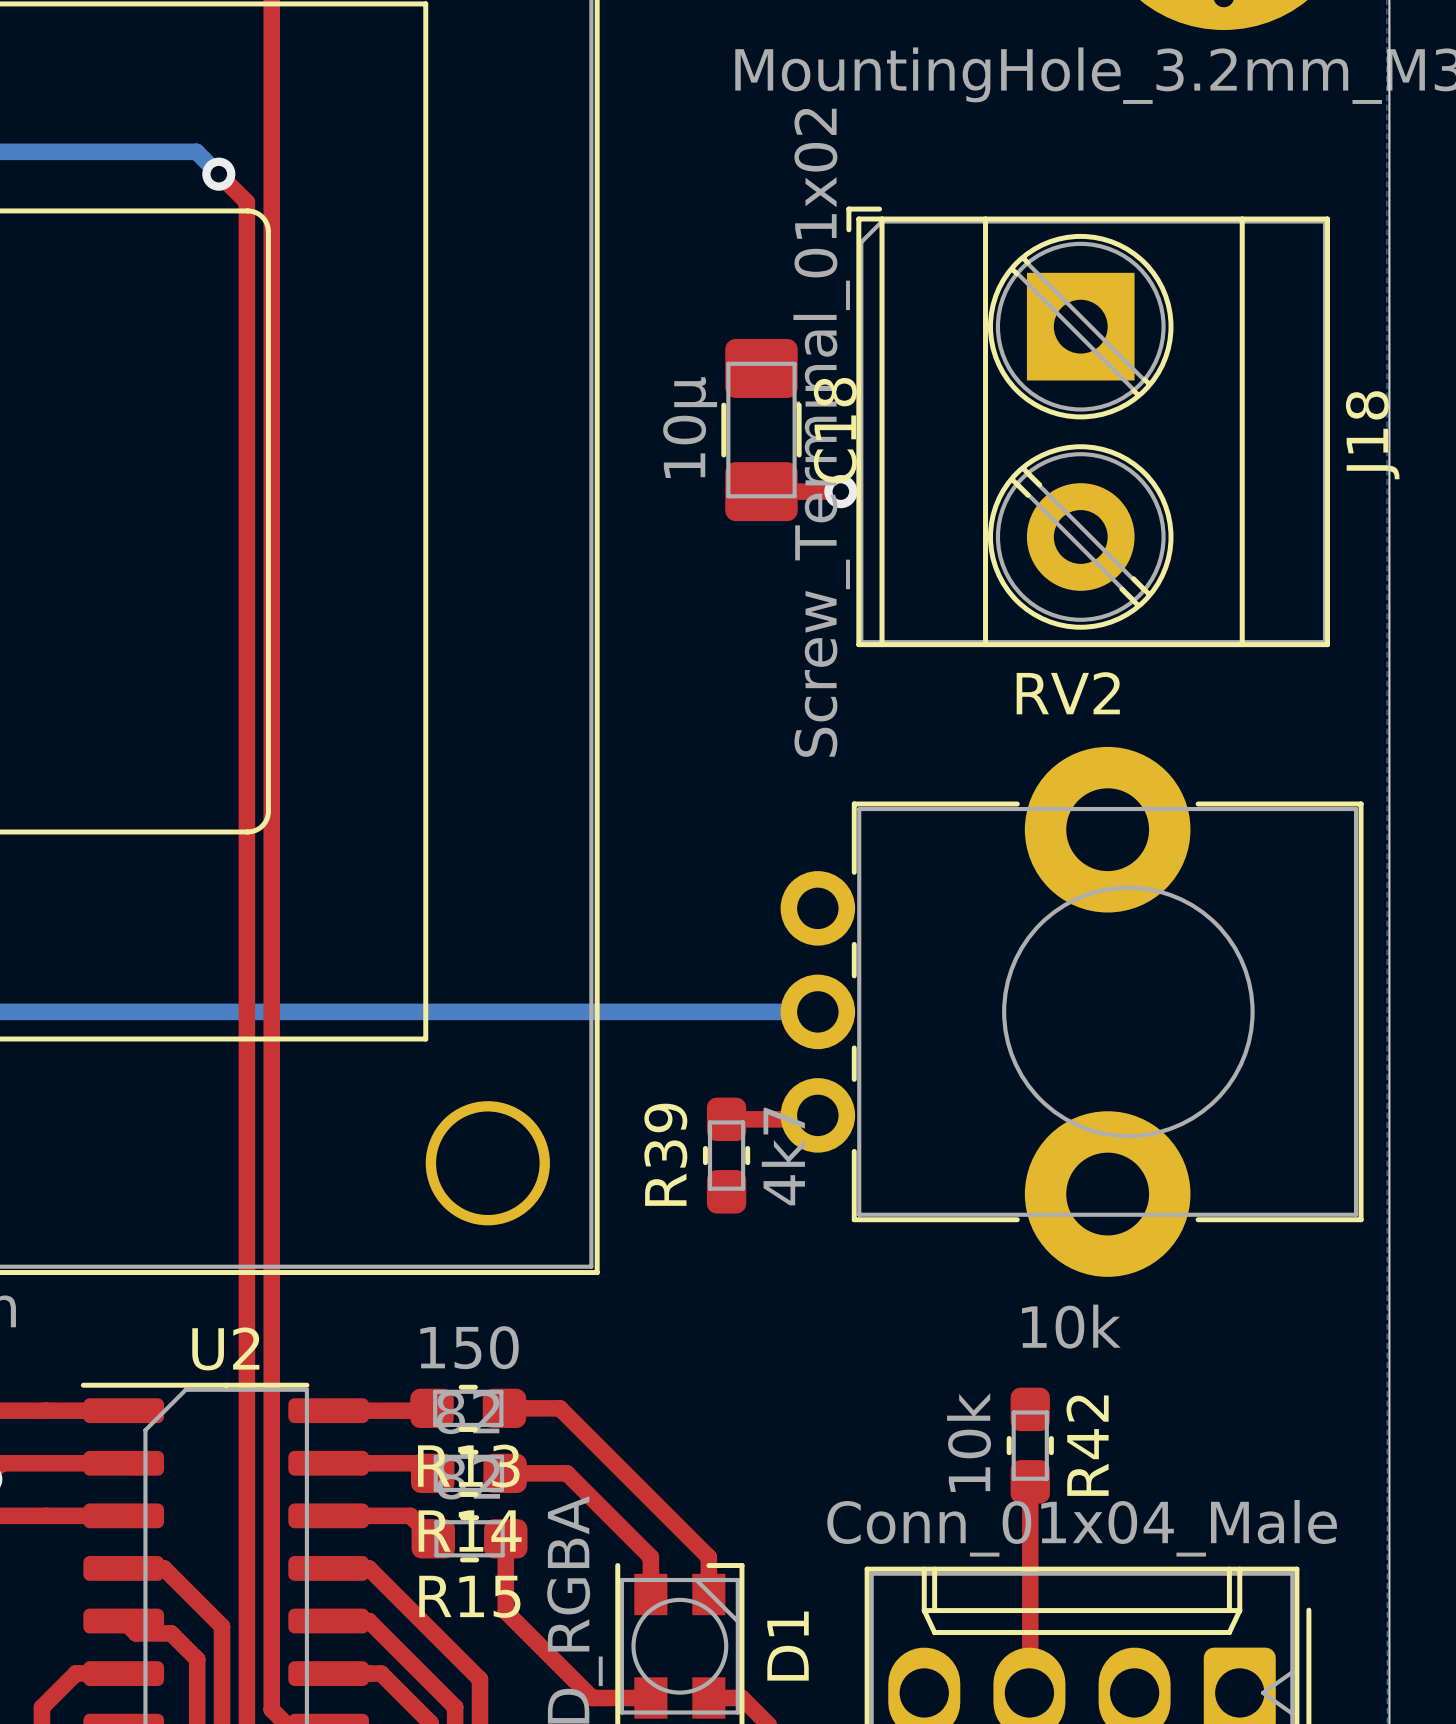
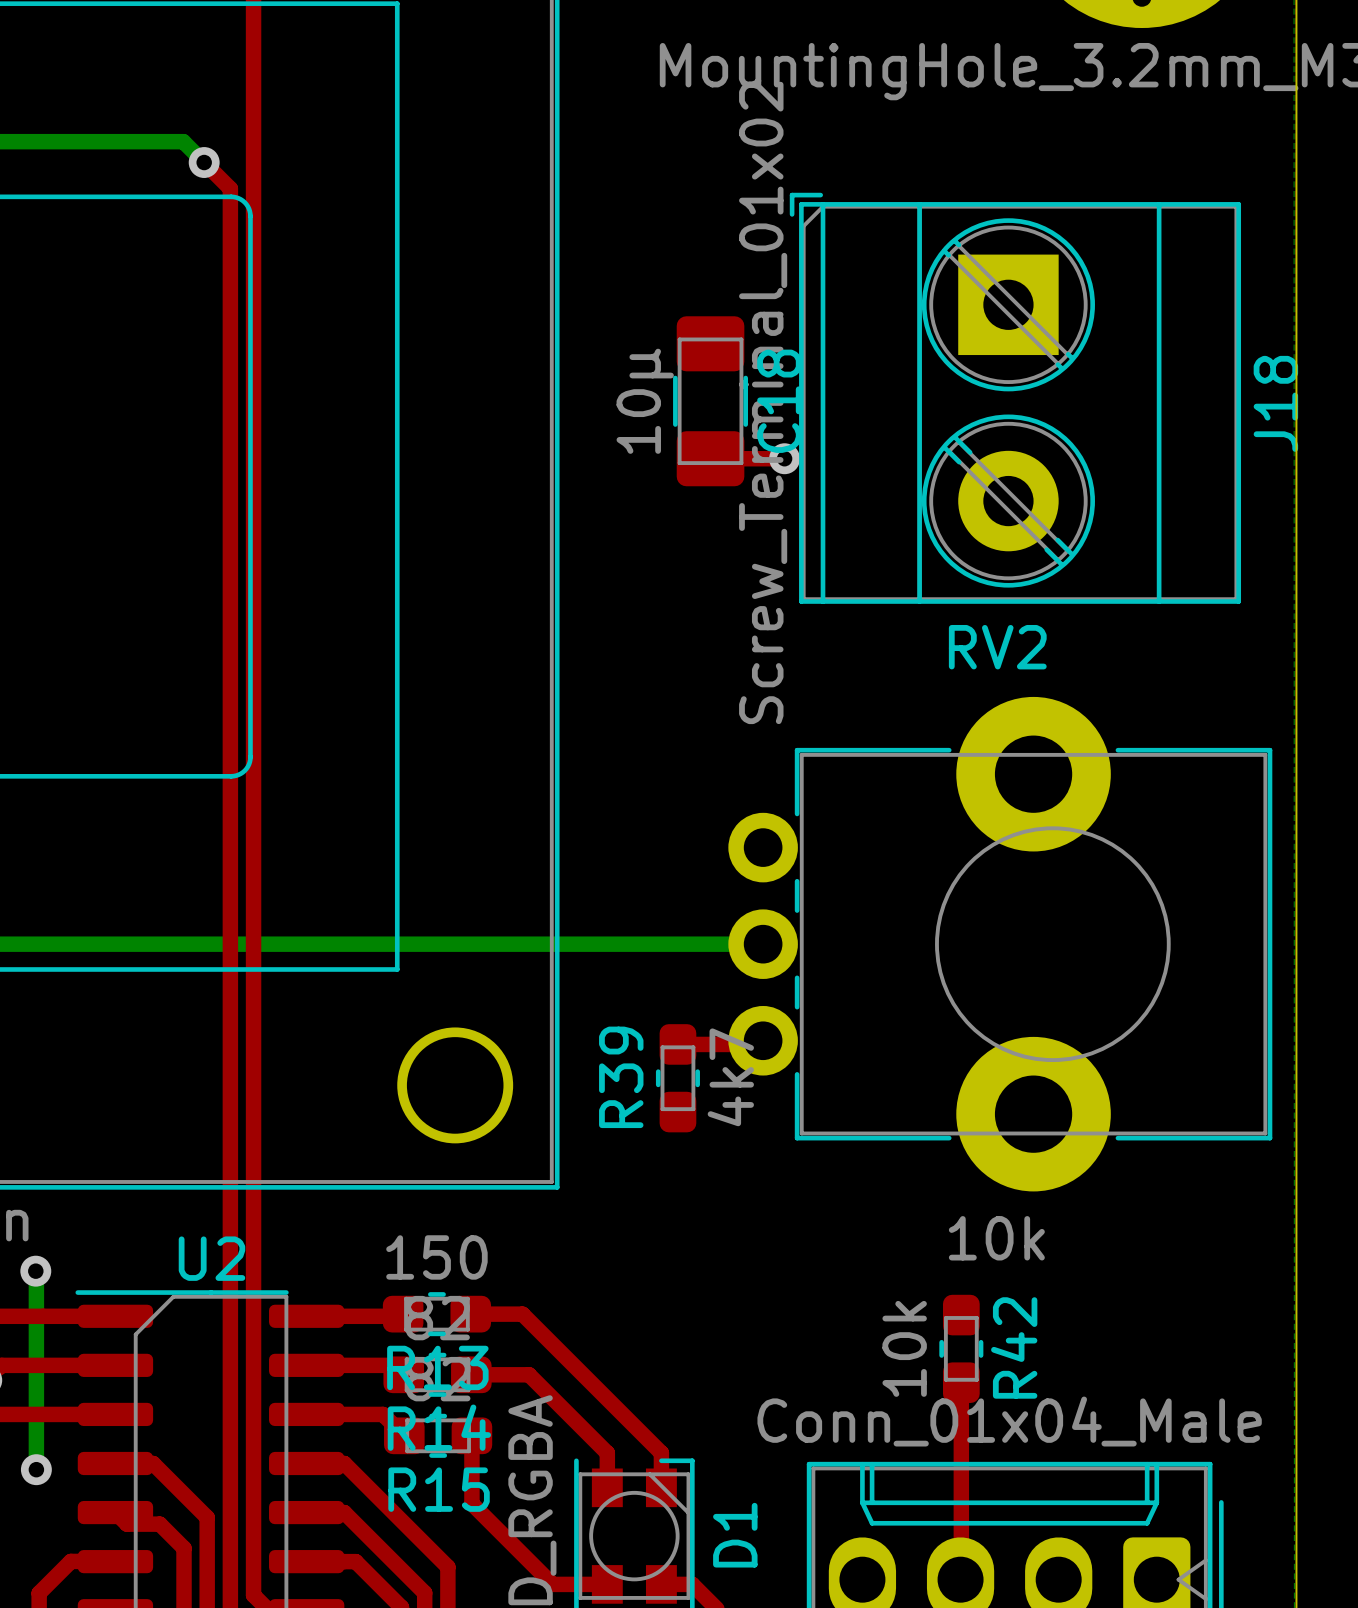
bottom track: none -> (35, 1271) (36, 1469)
via: none -> (35, 1271)
via: none -> (36, 1469)

